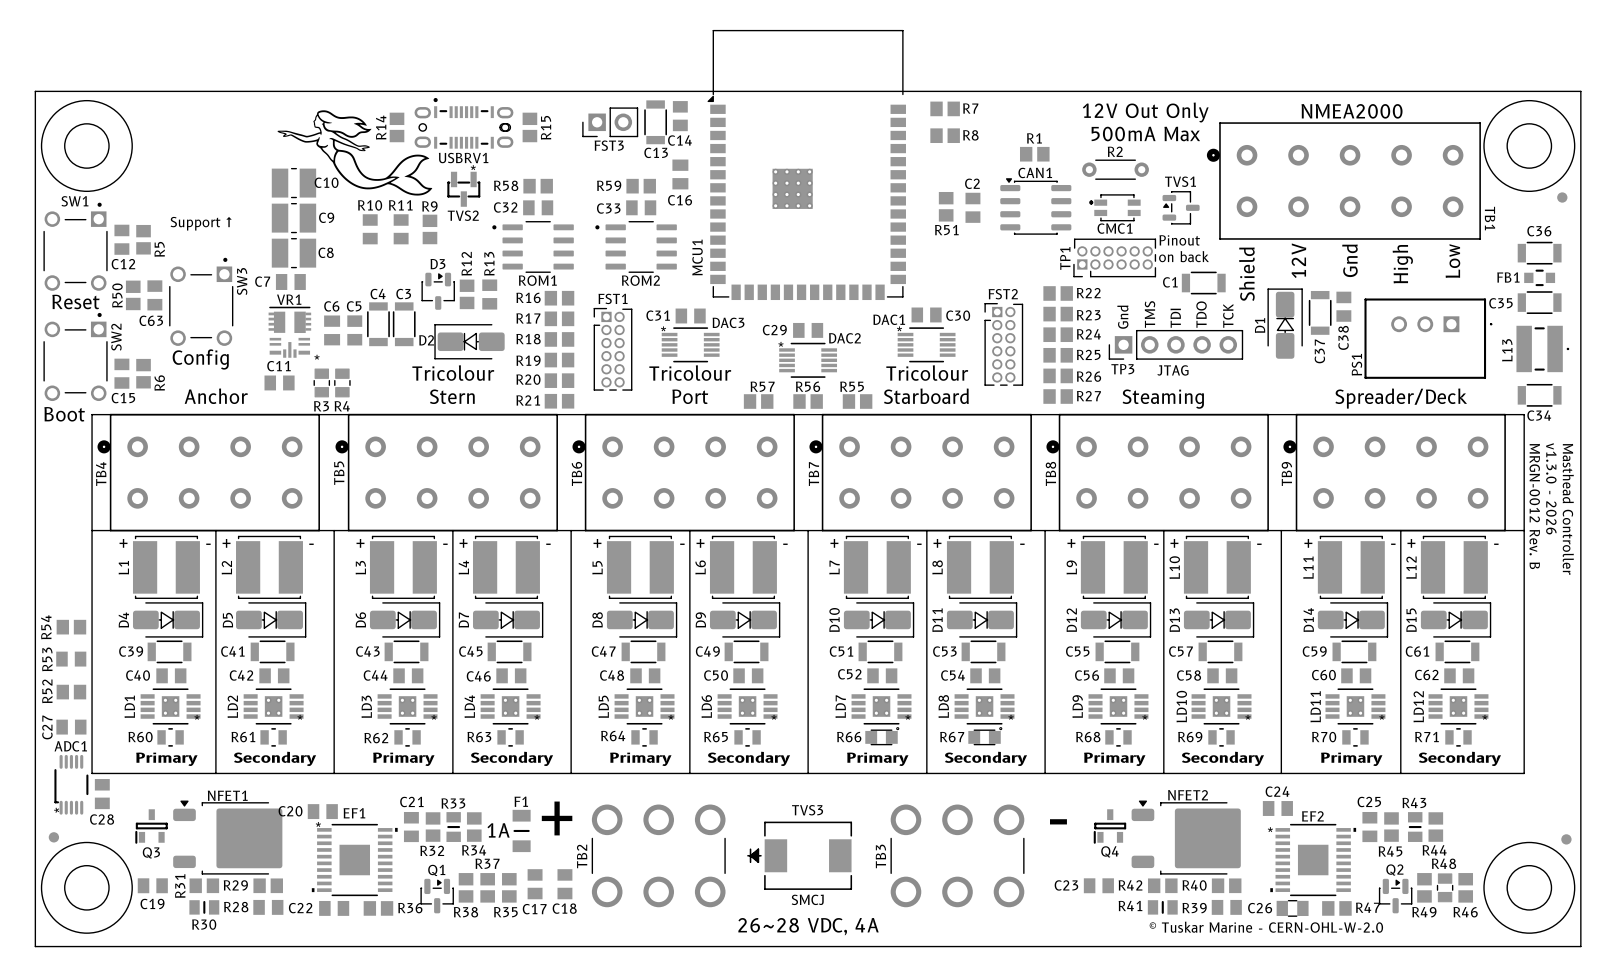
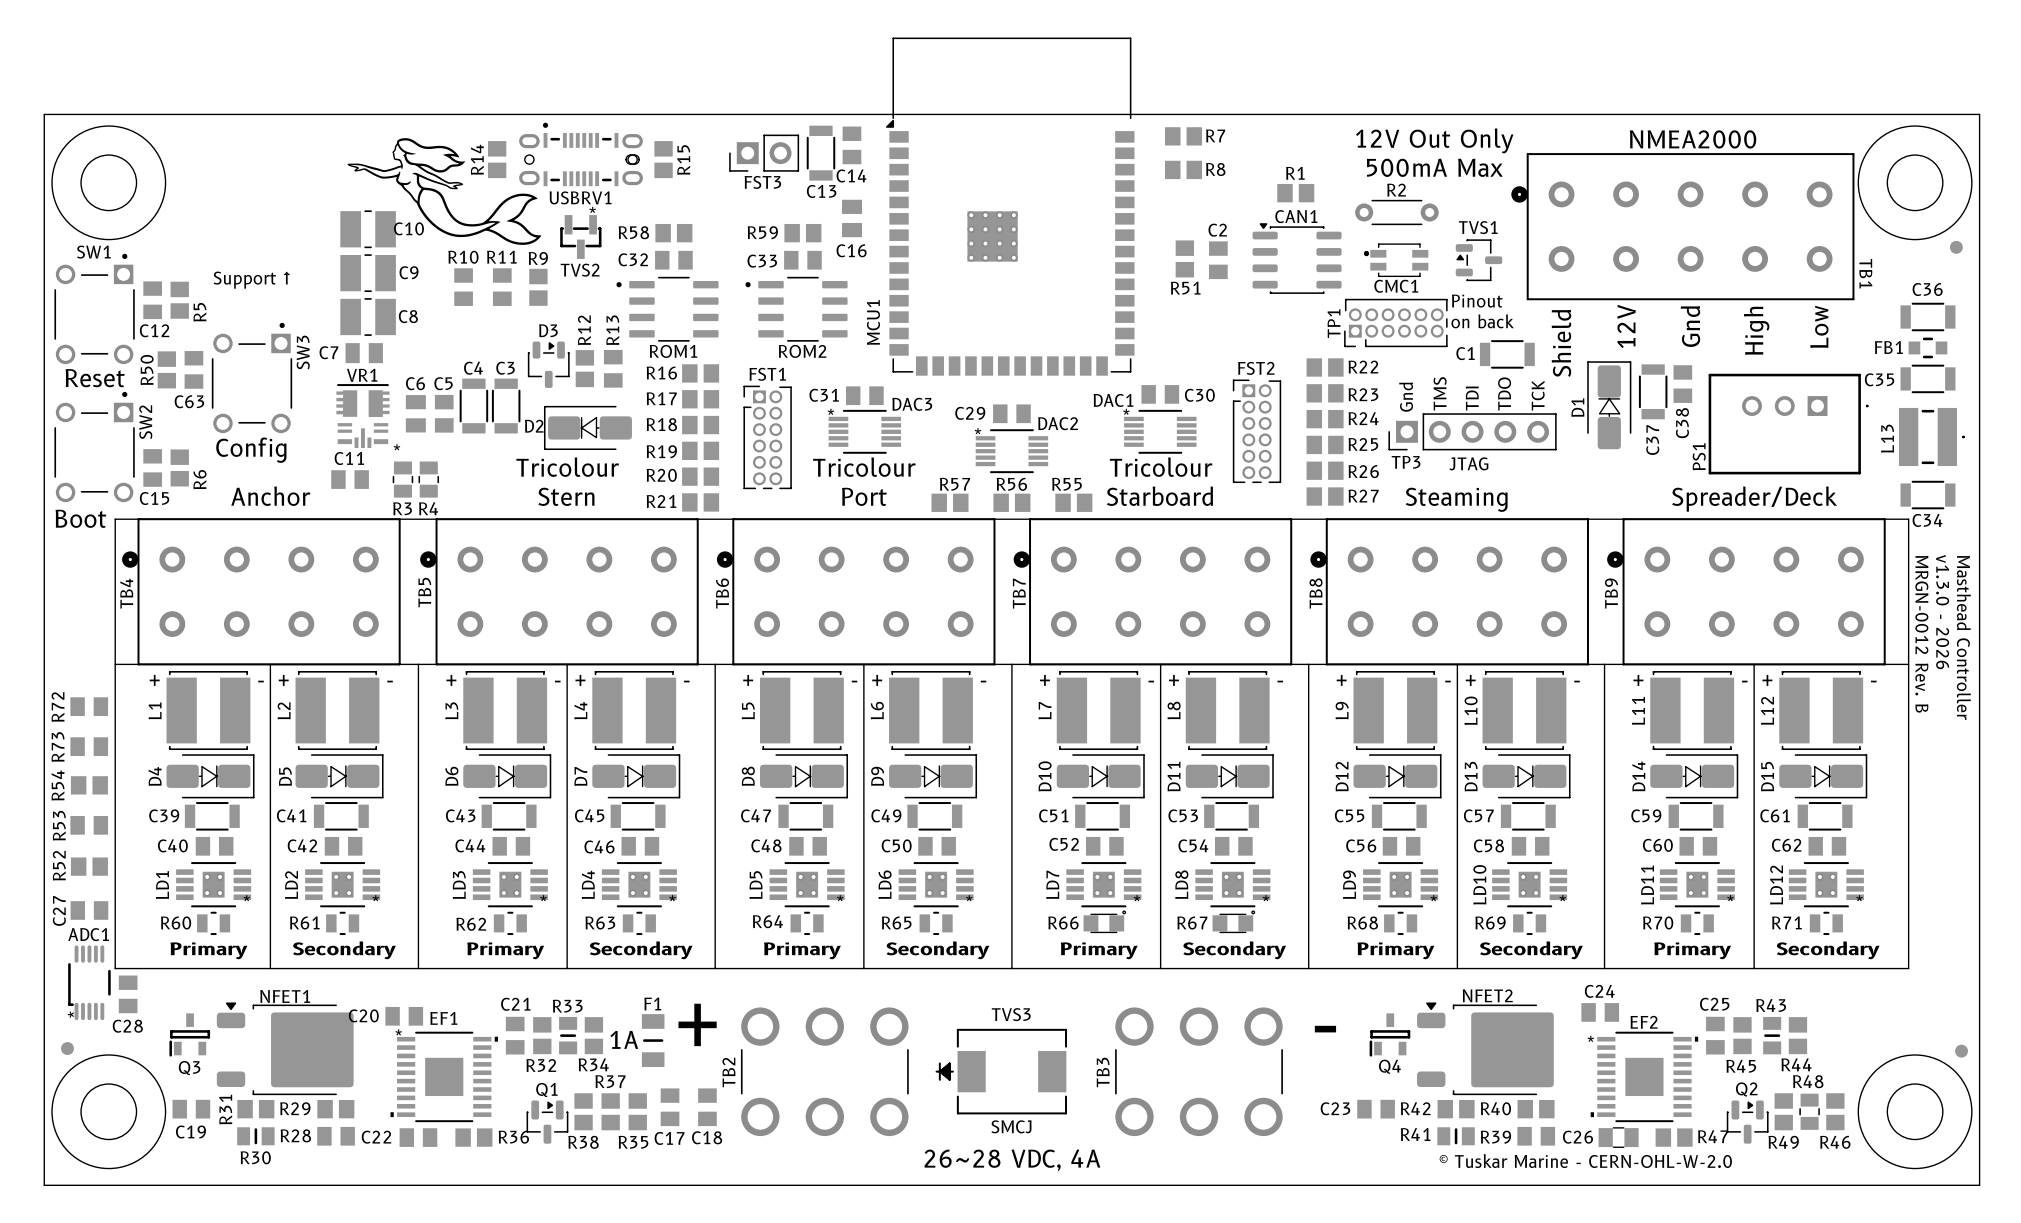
R72: none -> (89, 706)
R73: none -> (89, 746)

